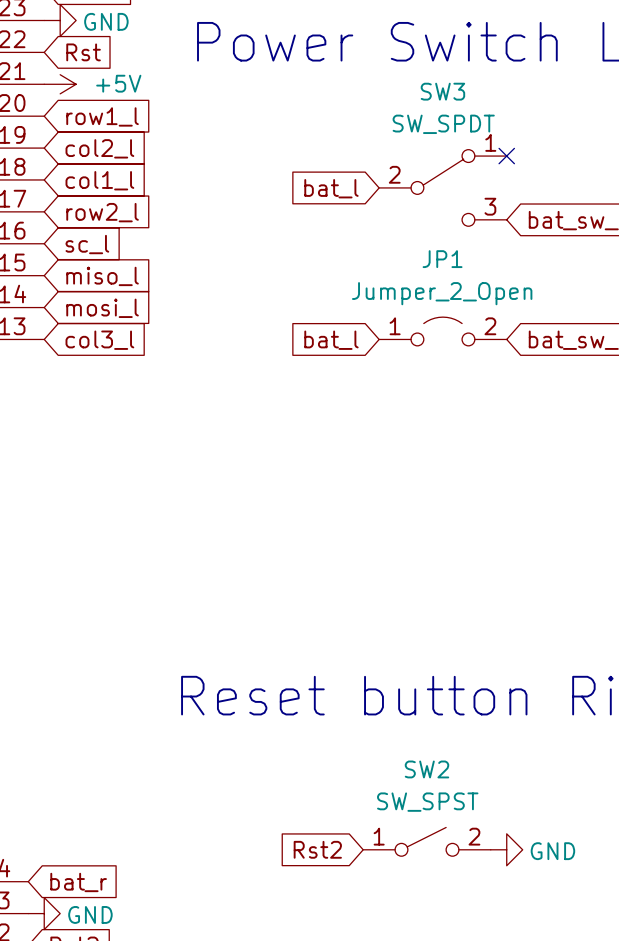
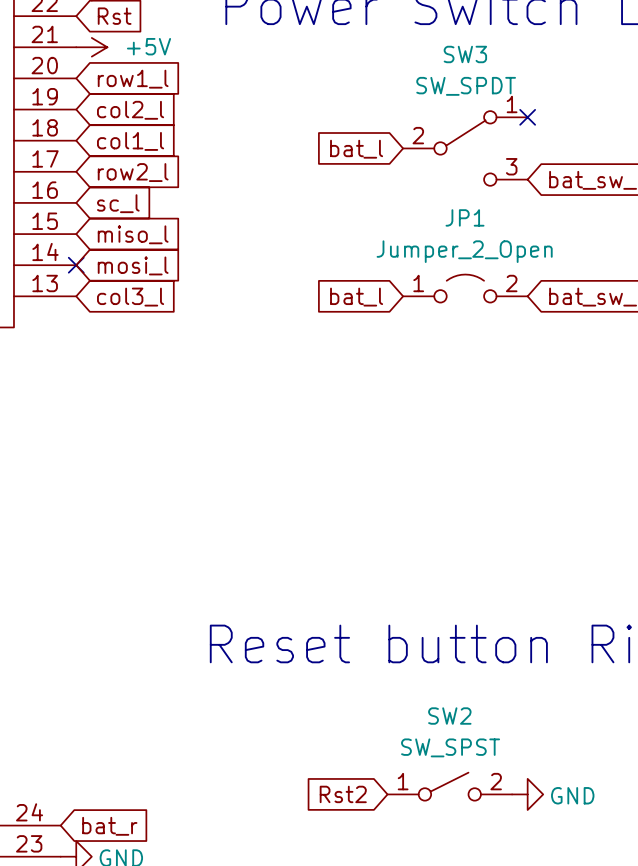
no-connect mark: none -> (76, 265)

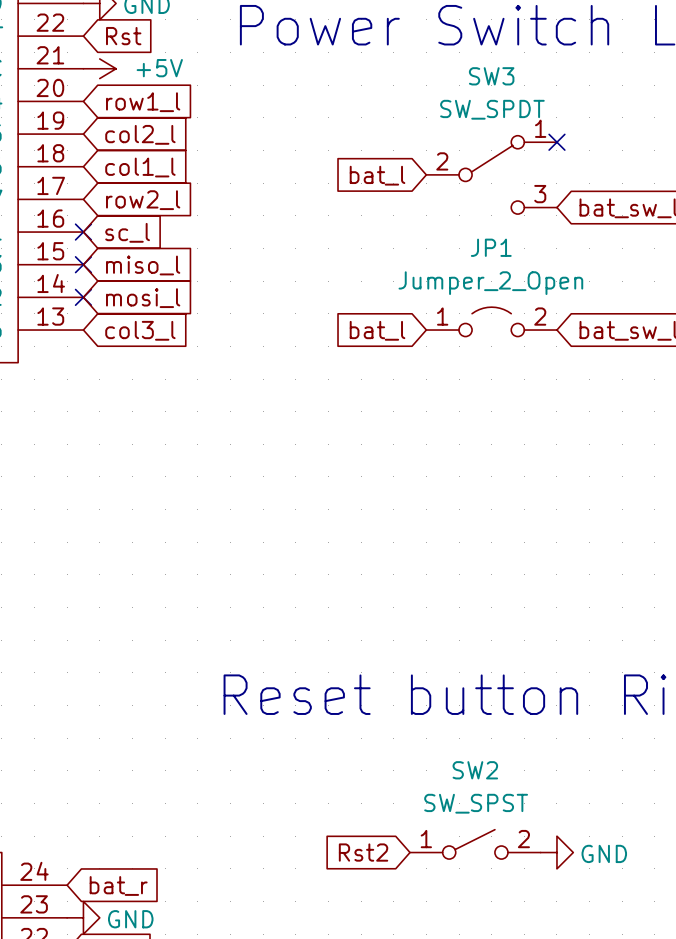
no-connect mark: none -> (83, 232)
no-connect mark: none -> (83, 264)

